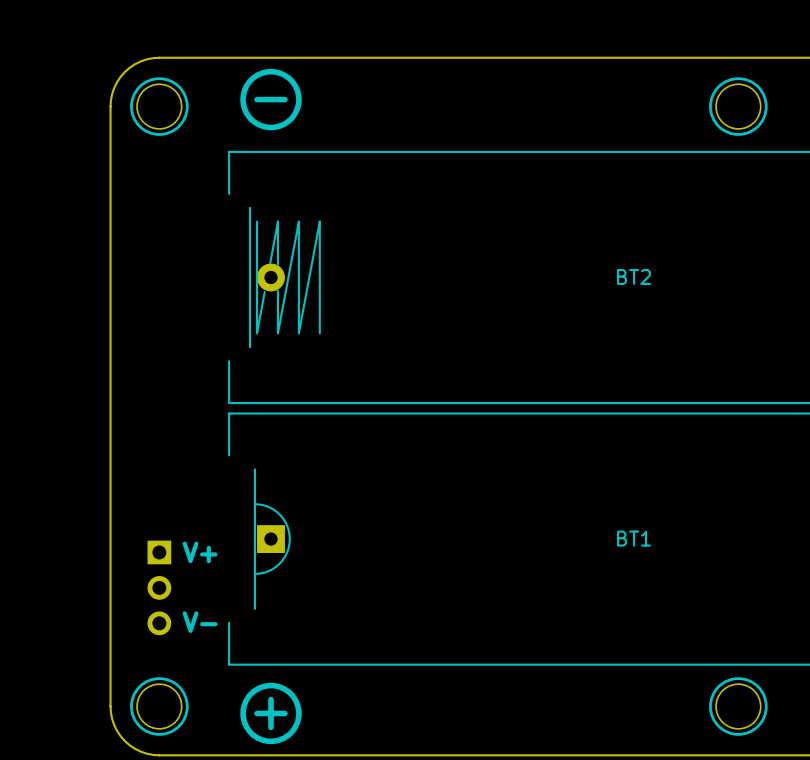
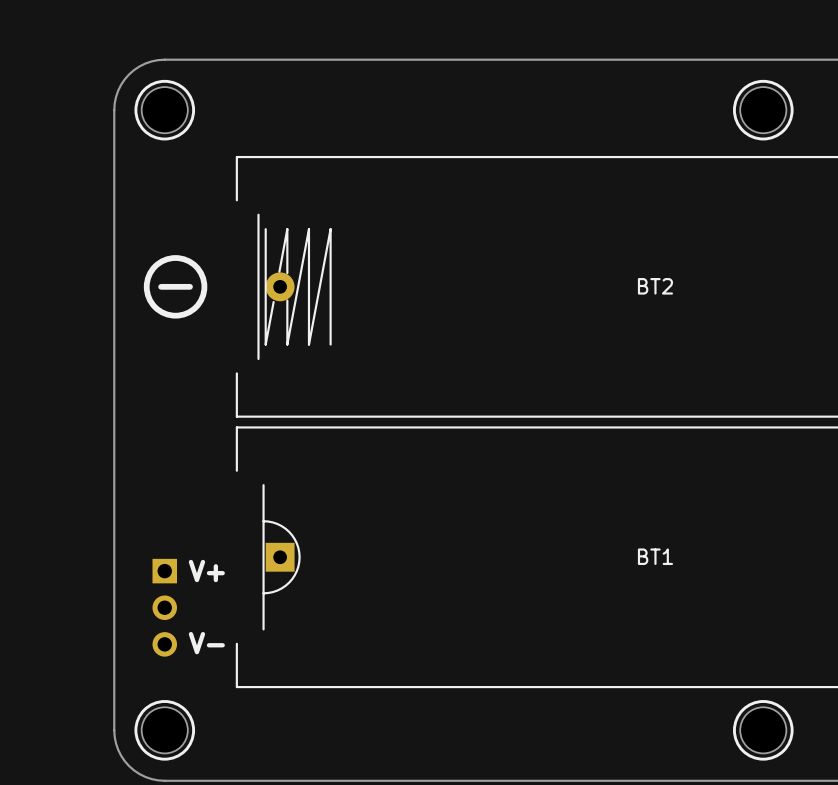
drawing position: (270, 99) -> (175, 286)
line: (284, 99) (257, 99) -> (189, 286) (161, 286)
drawing: [240, 682, 302, 745] -> none
line: (270, 699) (270, 727) -> none
line: (284, 713) (257, 713) -> none

